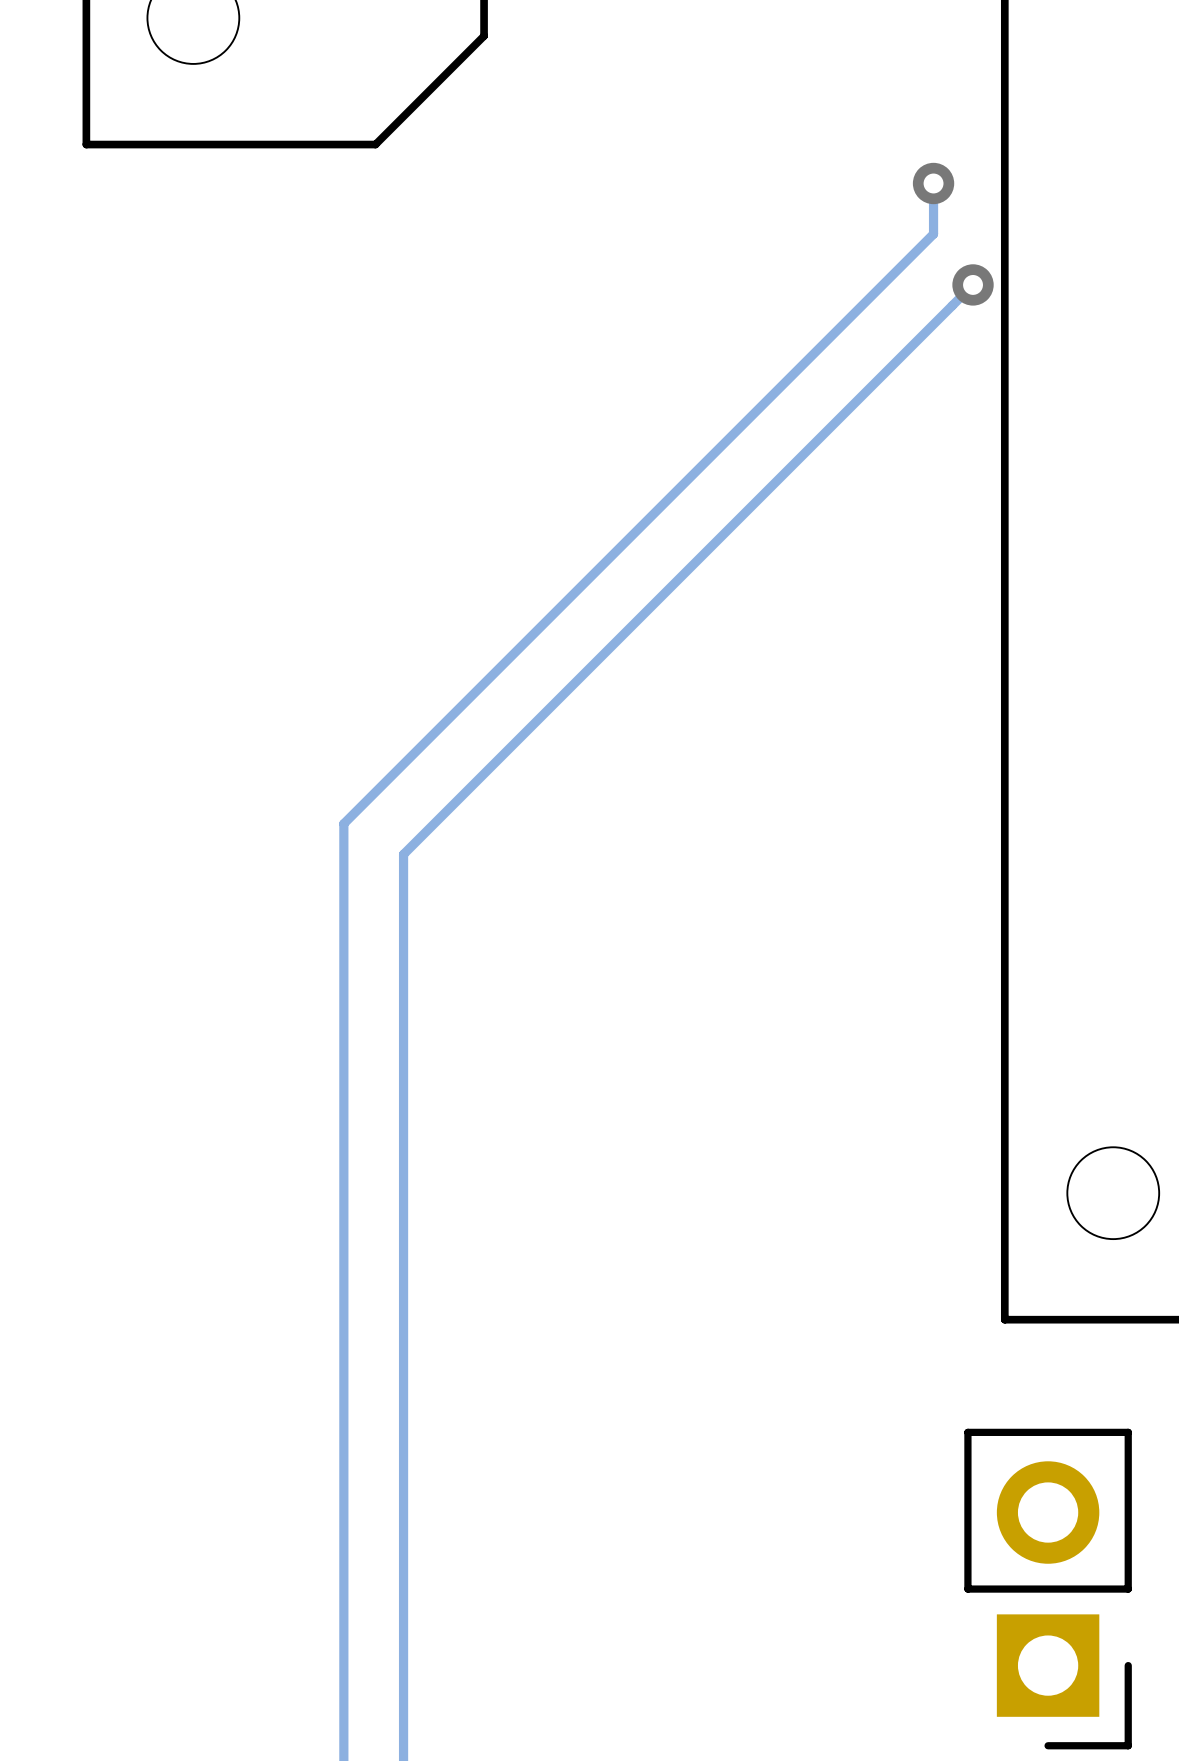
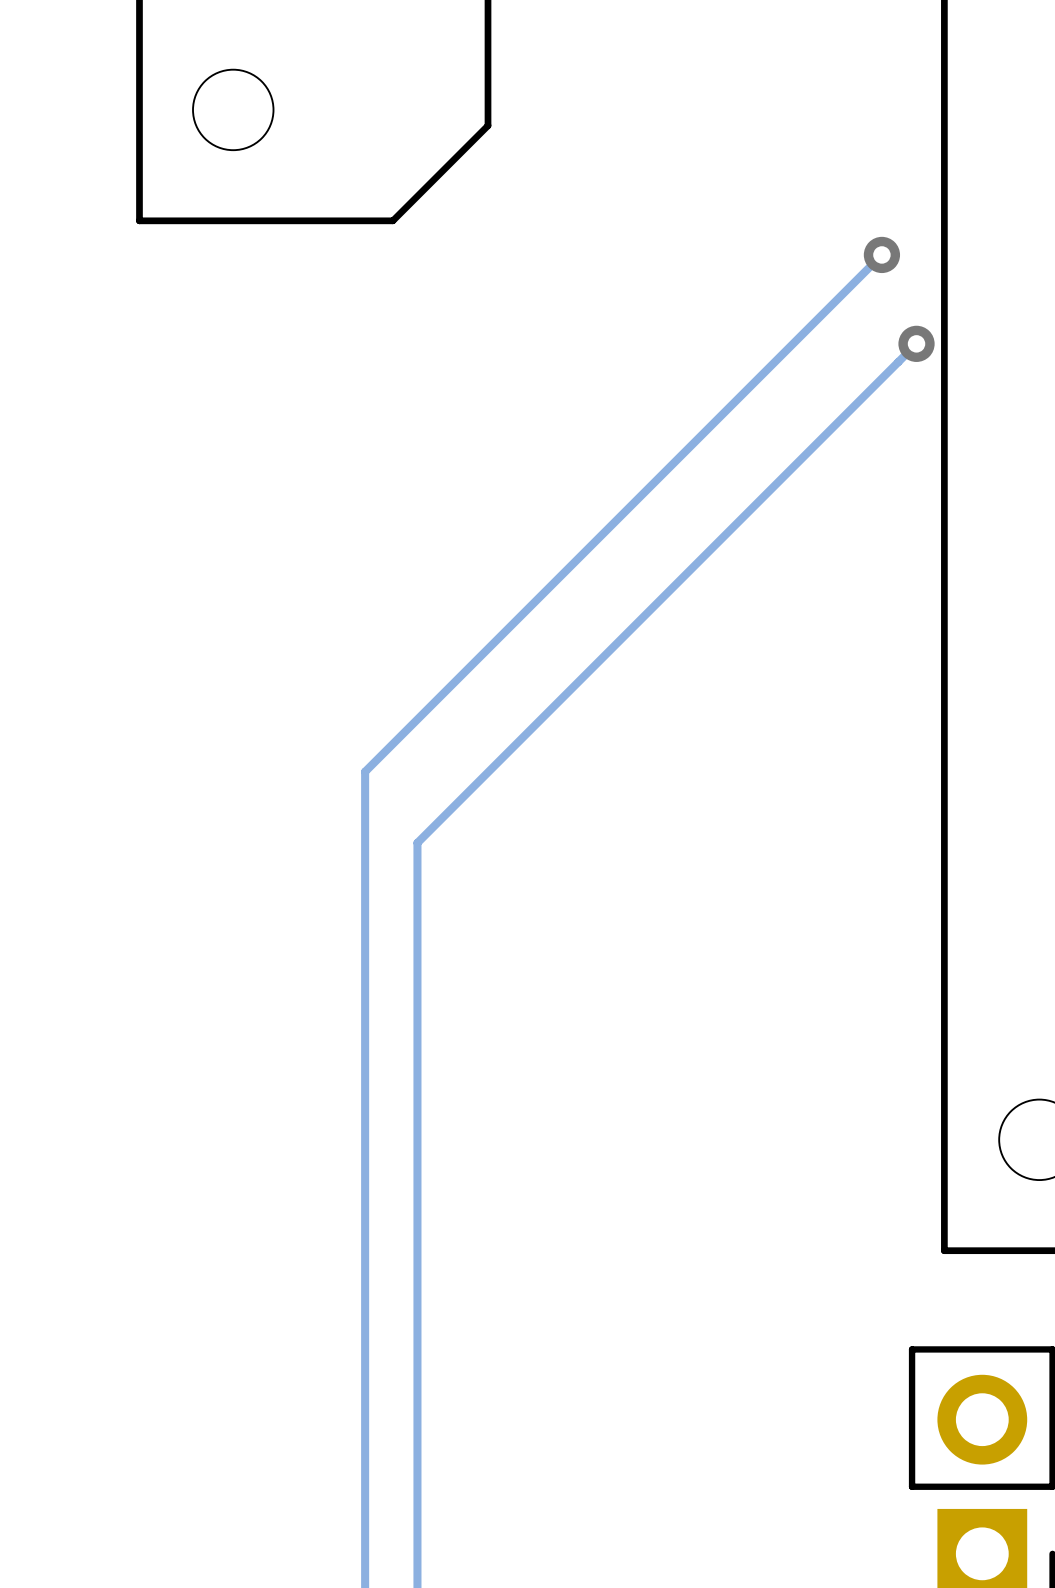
track: (933, 183) (933, 234) (343, 823) -> (881, 254) (365, 771) (365, 816)

